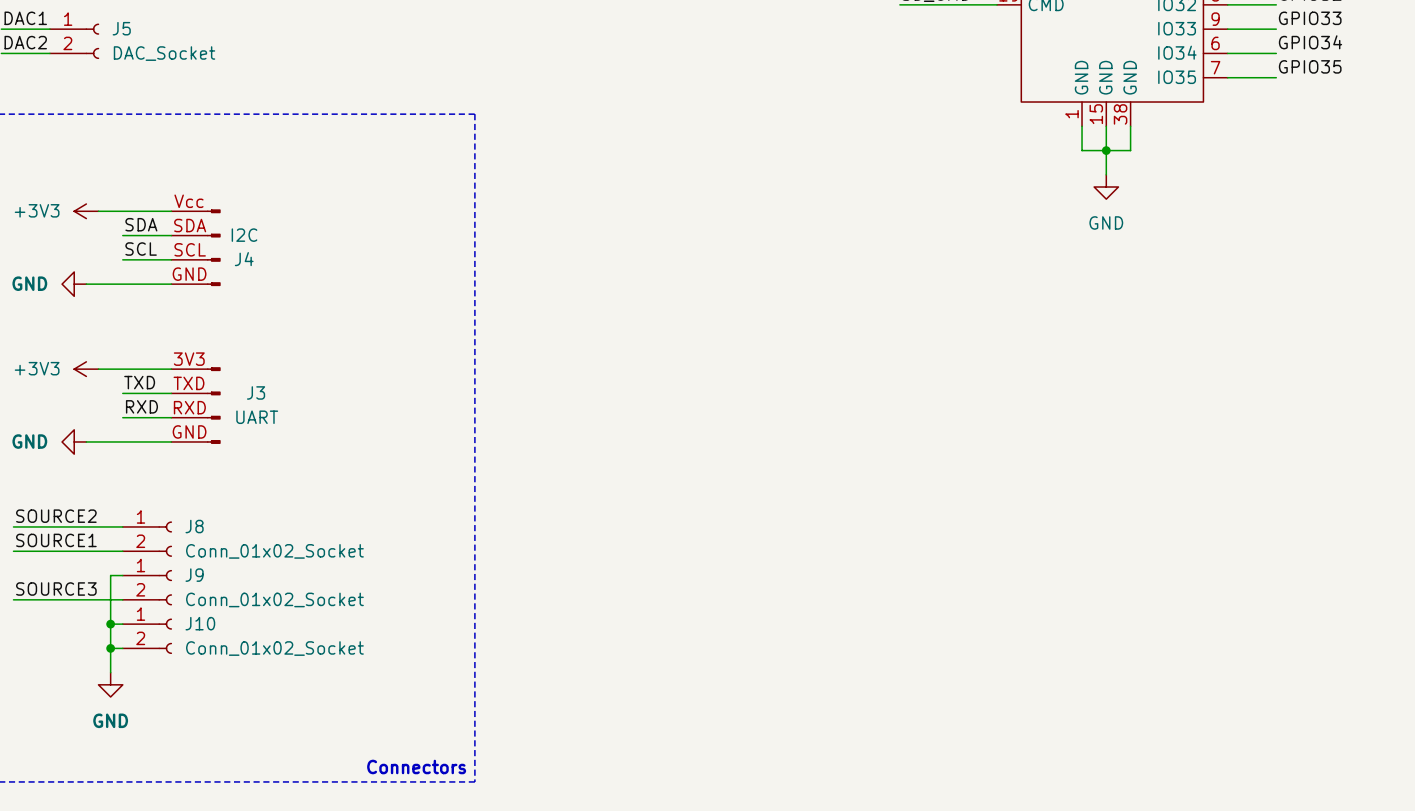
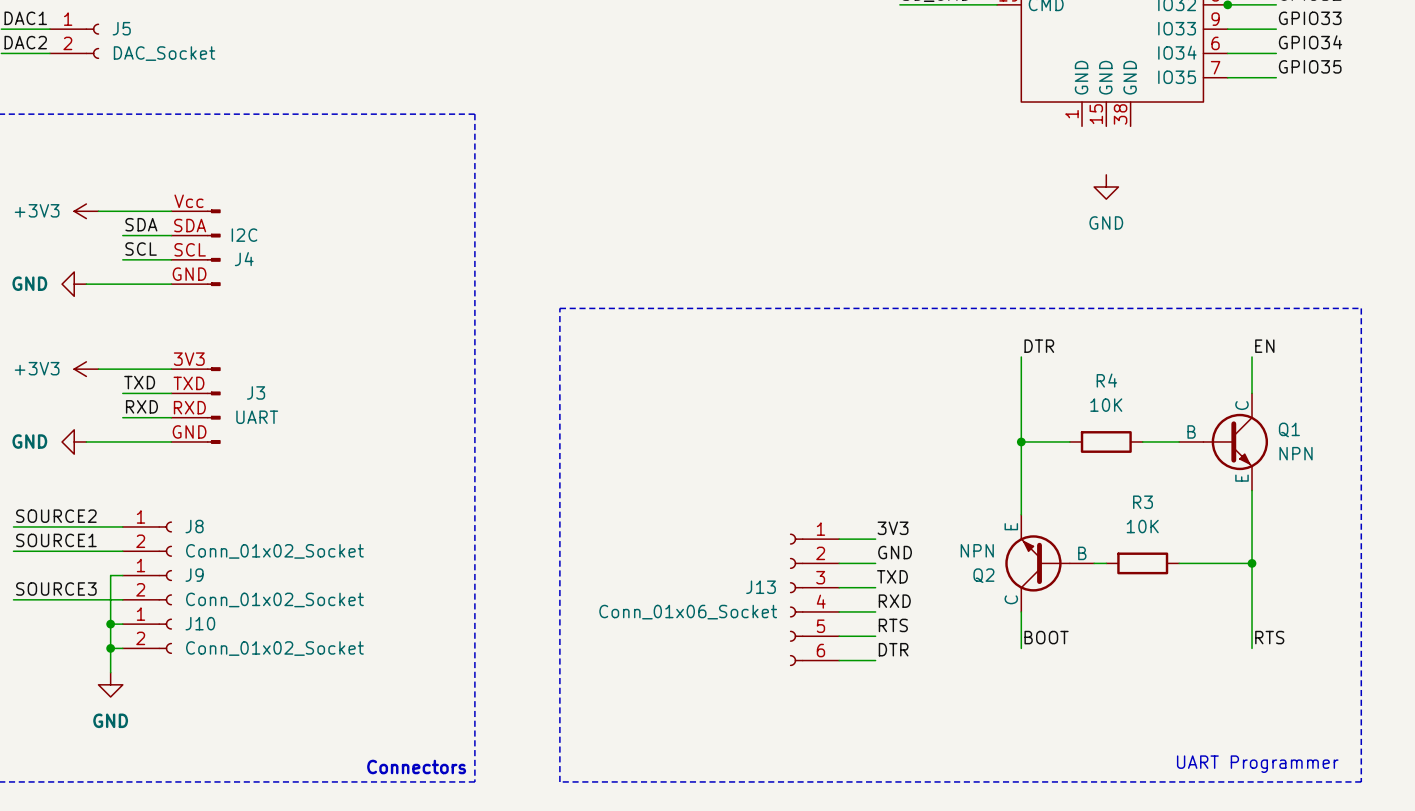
junction: none -> (1227, 4)
wire: (1082, 126) (1082, 150) (1130, 150) (1130, 126) -> none
wire: (1106, 126) (1106, 174) -> none
junction: (1106, 150) -> none
line: none -> (559, 308) (1361, 308) (1361, 781) (559, 781) (559, 308)
label: none -> DTR (1039, 346)
label: none -> EN (1264, 346)
wire: none -> (1021, 356) (1021, 514)
wire: none -> (1252, 356) (1252, 393)
wire: none -> (1021, 441) (1069, 441)
junction: none -> (1021, 441)
R4: none -> 10K (1106, 441)
wire: none -> (1142, 441) (1179, 441)
Q1: none -> NPN (1223, 441)
wire: none -> (1252, 490) (1252, 648)
label: none -> 3V3 (893, 528)
wire: none -> (839, 539) (875, 539)
label: none -> GND (895, 552)
wire: none -> (839, 563) (875, 563)
Q2: none -> NPN (1049, 563)
wire: none -> (1094, 563) (1106, 563)
R3: none -> 10K (1142, 563)
wire: none -> (1179, 563) (1252, 563)
junction: none -> (1252, 563)
label: none -> TXD (892, 576)
wire: none -> (839, 587) (875, 587)
J13: none -> Conn_01x06_Socket (814, 599)
label: none -> RXD (894, 601)
wire: none -> (839, 611) (875, 611)
wire: none -> (1021, 611) (1021, 648)
label: none -> RTS (893, 625)
wire: none -> (839, 636) (875, 636)
label: none -> BOOT (1046, 637)
label: none -> RTS (1269, 637)
label: none -> DTR (893, 649)
wire: none -> (839, 660) (875, 660)
text: none -> UART Programmer (1257, 764)

